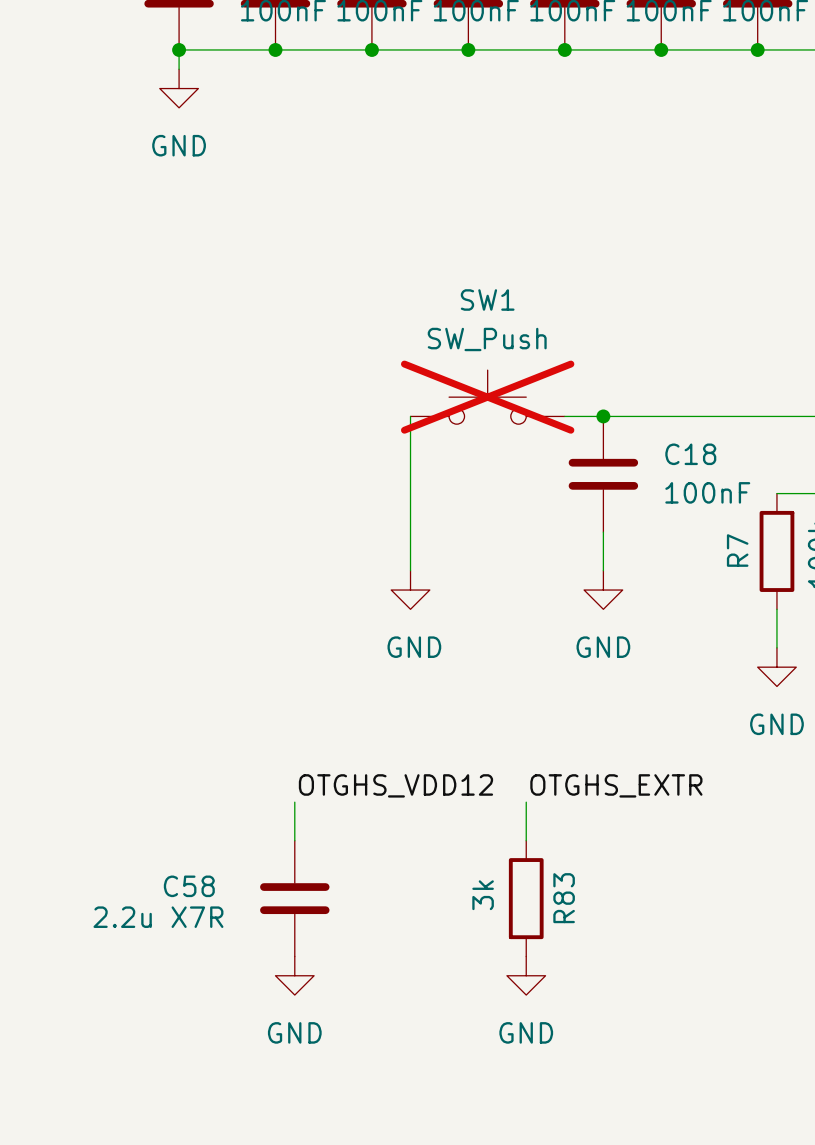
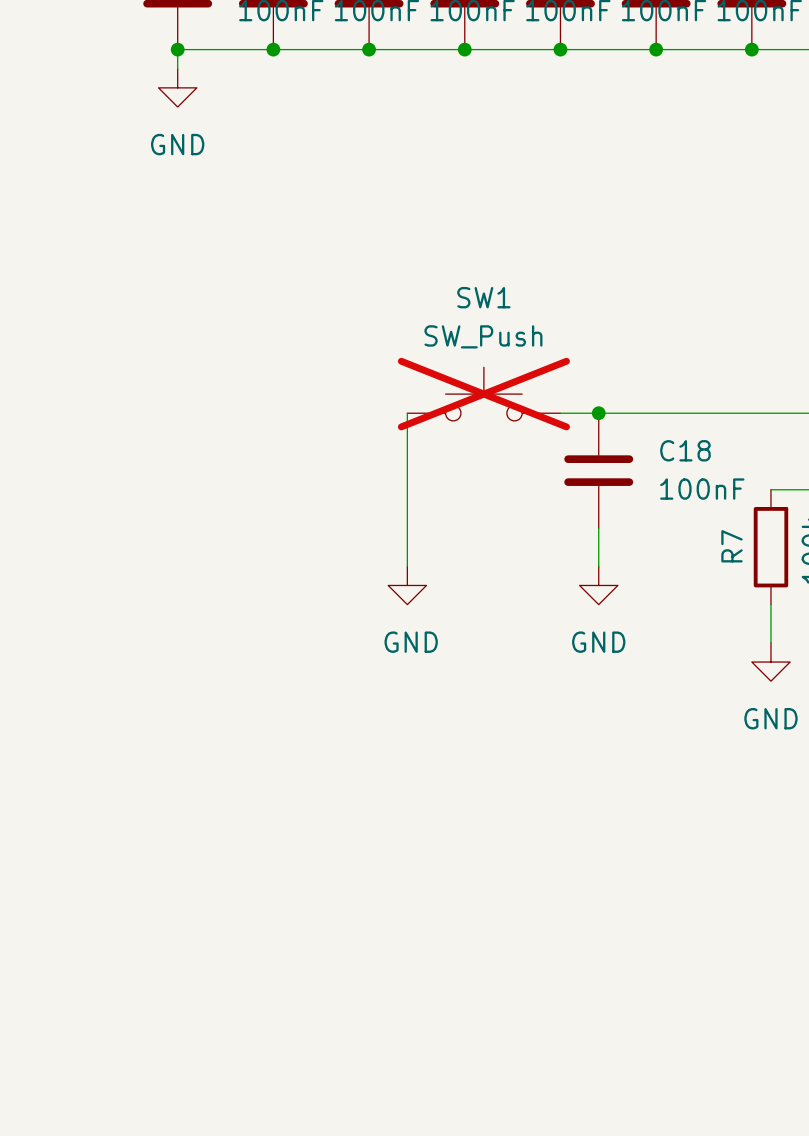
label: OTGHS_VDD12 (395, 785) -> none
label: OTGHS_EXTR (616, 785) -> none
wire: (294, 802) (294, 840) -> none
wire: (526, 802) (526, 840) -> none
C58: 2.2u X7R (294, 898) -> none
R83: 3k (526, 898) -> none
power symbol: GND (294, 975) -> none
power symbol: GND (526, 975) -> none

